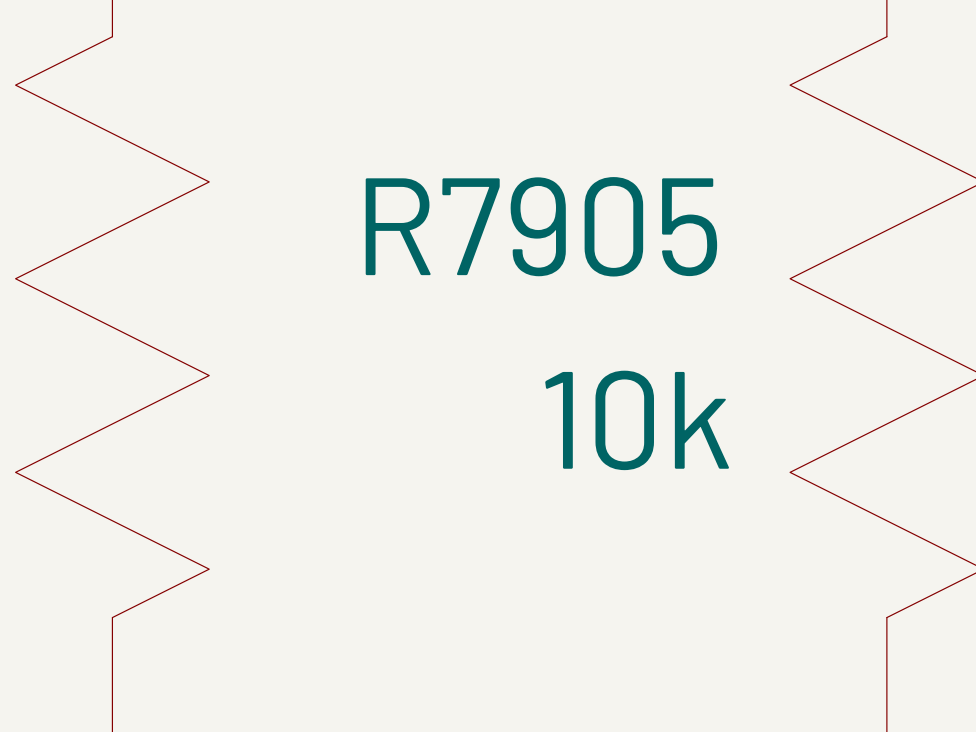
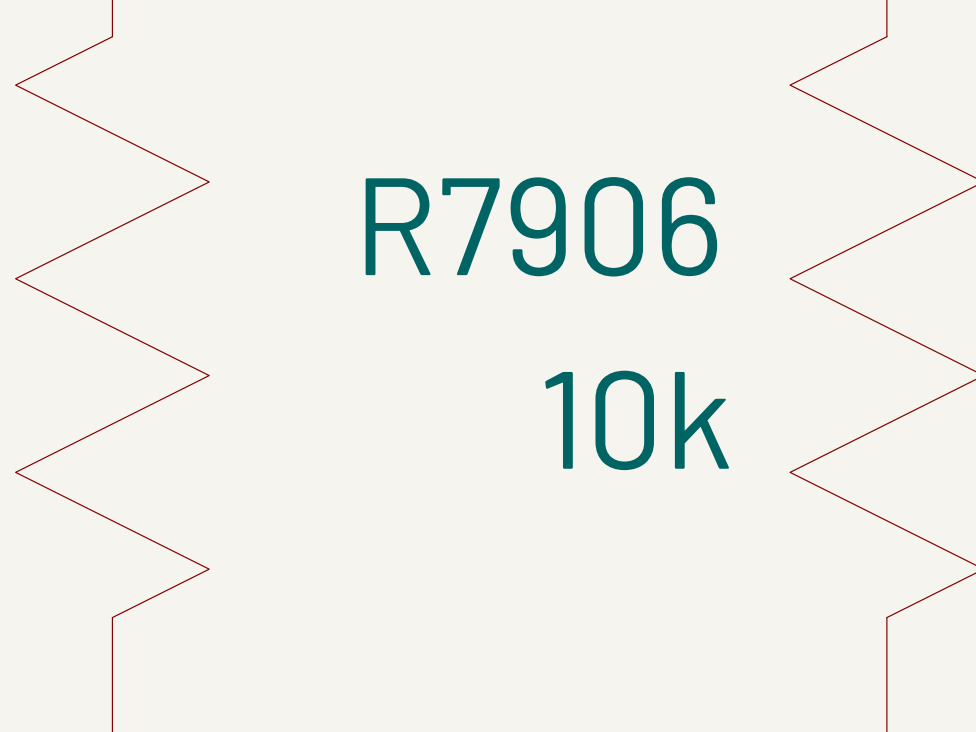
R7905 name: R7905 (541, 226) -> R7906 (541, 226)

